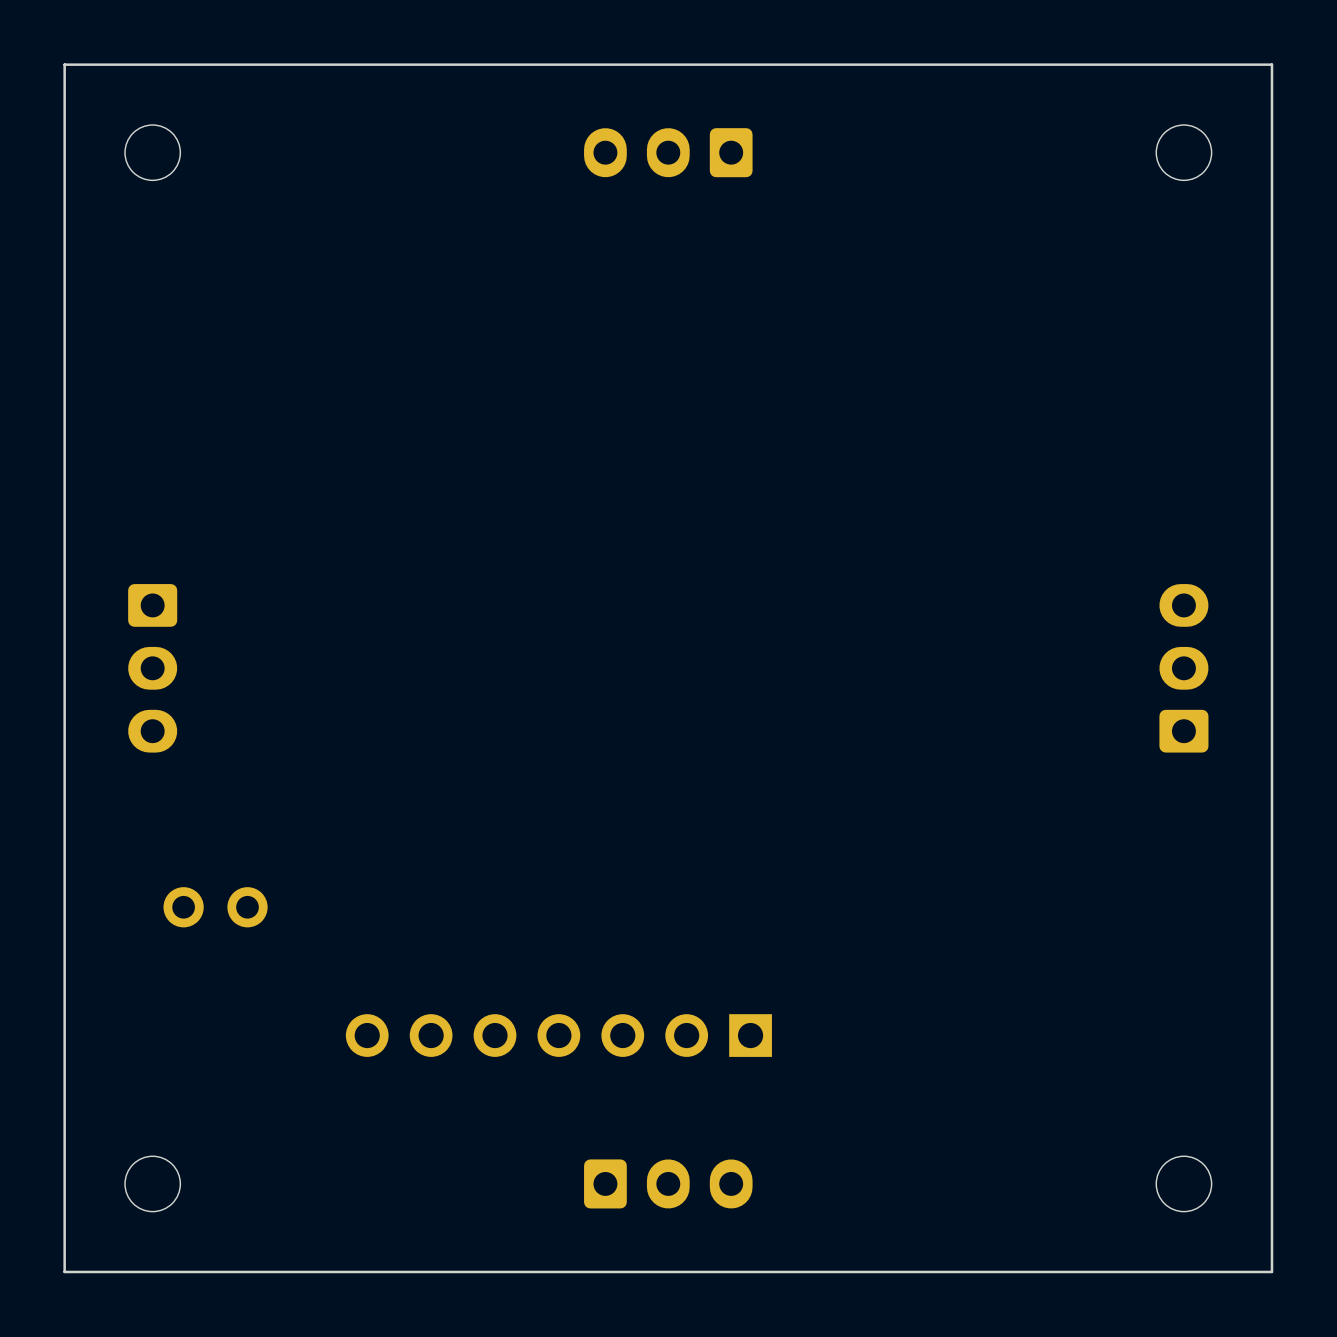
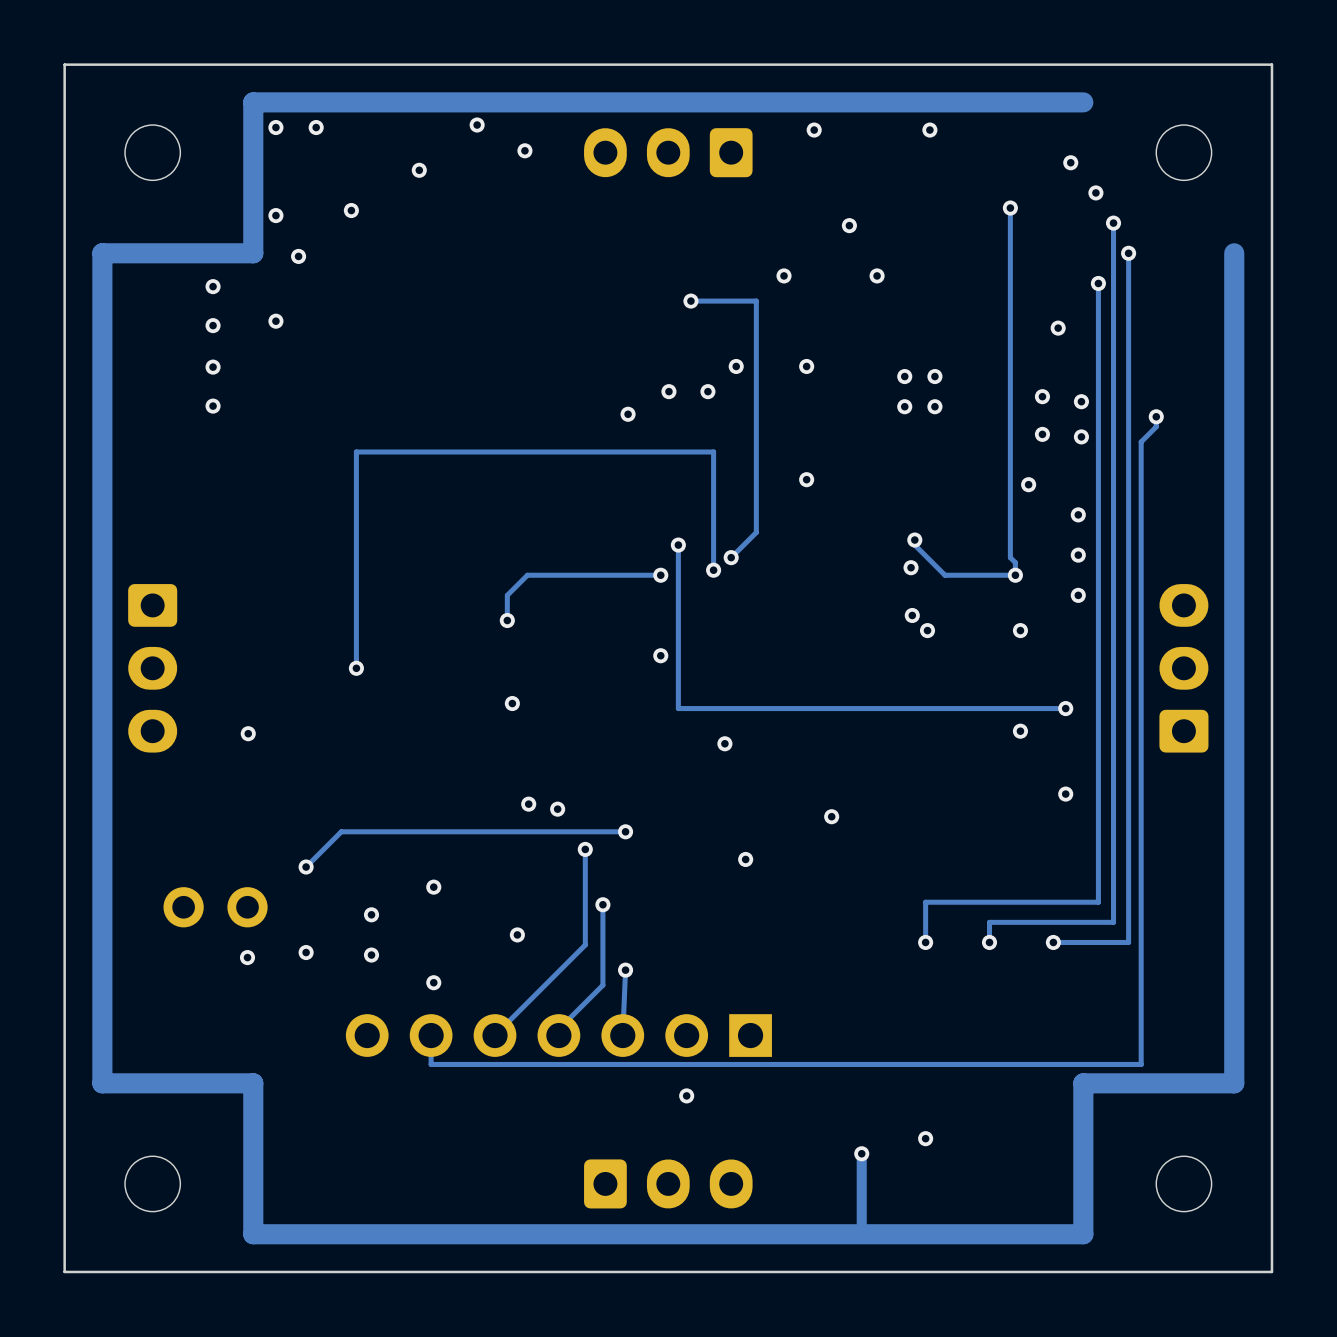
track: none -> (1083, 102) (253, 102) (253, 253) (102, 253) (102, 1083) (253, 1083) (253, 1234) (1083, 1234) (1083, 1083) (1234, 1083) (1234, 253)
via: none -> (477, 125)
via: none -> (275, 127)
via: none -> (316, 127)
via: none -> (814, 130)
via: none -> (929, 130)
via: none -> (524, 150)
via: none -> (1070, 162)
via: none -> (419, 170)
via: none -> (1095, 192)
track: none -> (1010, 208) (1010, 557) (1015, 562) (1015, 575) (944, 575) (914, 545) (914, 540)
via: none -> (1010, 208)
via: none -> (351, 210)
via: none -> (275, 215)
track: none -> (1113, 223) (1113, 922) (989, 922) (989, 942)
via: none -> (1113, 223)
via: none -> (849, 225)
track: none -> (1128, 253) (1128, 942) (1053, 942)
via: none -> (1128, 253)
via: none -> (298, 256)
via: none -> (784, 275)
via: none -> (877, 275)
track: none -> (1098, 283) (1098, 902) (925, 902) (925, 942)
via: none -> (1098, 283)
via: none -> (213, 286)
track: none -> (690, 301) (756, 301) (756, 532) (731, 557)
via: none -> (690, 301)
via: none -> (275, 321)
via: none -> (213, 325)
via: none -> (1058, 328)
via: none -> (736, 366)
via: none -> (806, 366)
via: none -> (213, 367)
via: none -> (904, 376)
via: none -> (934, 376)
via: none -> (668, 391)
via: none -> (707, 391)
via: none -> (1042, 396)
via: none -> (1081, 401)
via: none -> (213, 406)
via: none -> (904, 406)
via: none -> (934, 406)
via: none -> (628, 414)
track: none -> (1156, 416) (1156, 426) (1141, 441) (1141, 1064) (431, 1064) (431, 1035)
via: none -> (1156, 416)
via: none -> (1042, 434)
via: none -> (1081, 436)
via: none -> (806, 479)
via: none -> (1028, 484)
via: none -> (1078, 514)
via: none -> (914, 540)
track: none -> (678, 545) (678, 708) (1065, 708)
via: none -> (678, 545)
via: none -> (1078, 555)
via: none -> (731, 557)
via: none -> (911, 567)
track: none -> (713, 570) (713, 452) (356, 452) (356, 668)
via: none -> (713, 570)
track: none -> (660, 575) (527, 575) (507, 595) (507, 620)
via: none -> (660, 575)
via: none -> (1015, 575)
via: none -> (1078, 595)
via: none -> (912, 615)
via: none -> (507, 620)
via: none -> (927, 630)
via: none -> (1020, 630)
via: none -> (660, 655)
via: none -> (356, 668)
via: none -> (512, 703)
via: none -> (1065, 708)
via: none -> (1020, 731)
via: none -> (248, 733)
via: none -> (724, 743)
via: none -> (1065, 794)
via: none -> (528, 804)
via: none -> (557, 809)
via: none -> (831, 816)
track: none -> (625, 831) (341, 831) (306, 867)
via: none -> (625, 831)
track: none -> (585, 849) (585, 944) (495, 1035)
via: none -> (585, 849)
via: none -> (745, 859)
via: none -> (306, 867)
via: none -> (433, 887)
track: none -> (602, 904) (602, 985) (558, 1029) (558, 1035)
via: none -> (602, 904)
via: none -> (371, 914)
via: none -> (517, 934)
via: none -> (925, 942)
via: none -> (989, 942)
via: none -> (1053, 942)
via: none -> (306, 952)
via: none -> (371, 955)
via: none -> (247, 957)
track: none -> (625, 970) (622, 1035)
via: none -> (625, 970)
via: none -> (433, 982)
via: none -> (686, 1095)
via: none -> (925, 1138)
track: none -> (861, 1153) (861, 1234)
via: none -> (861, 1153)

